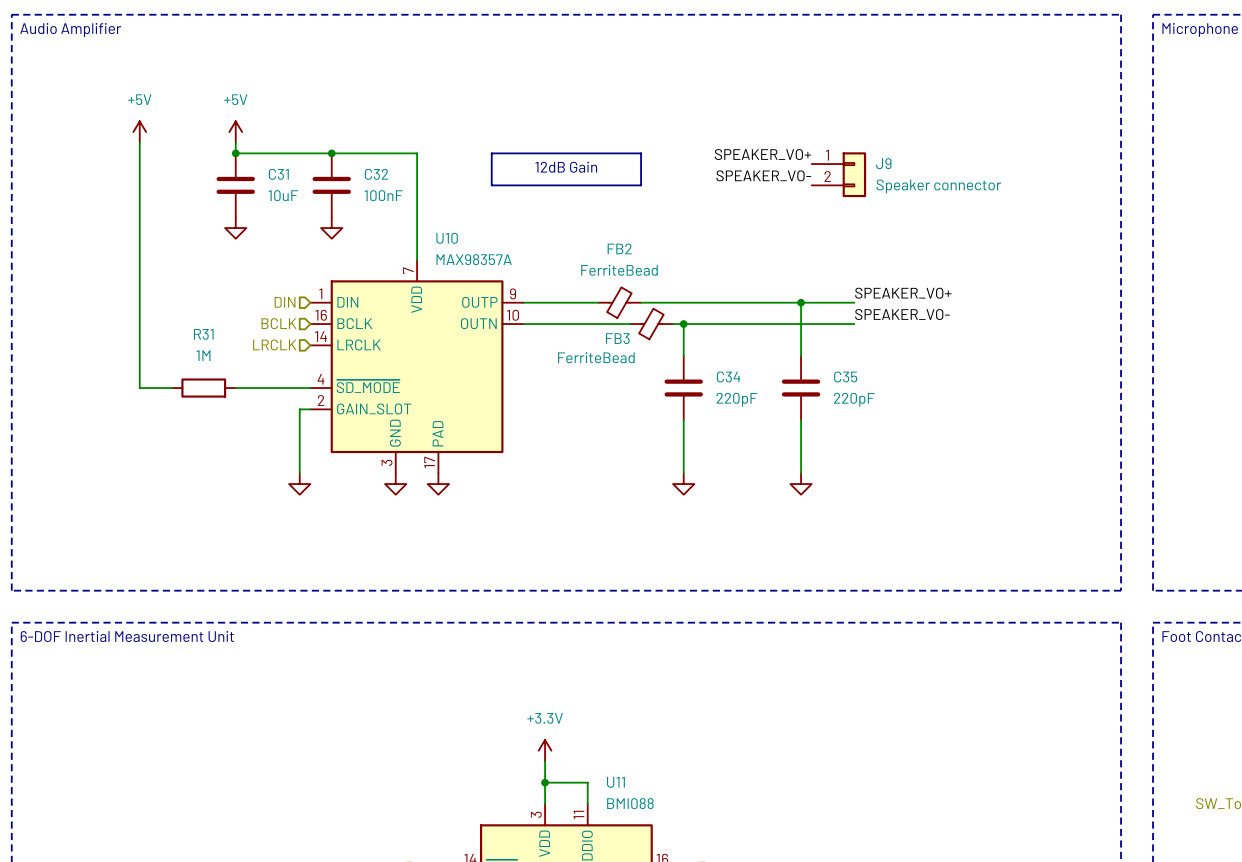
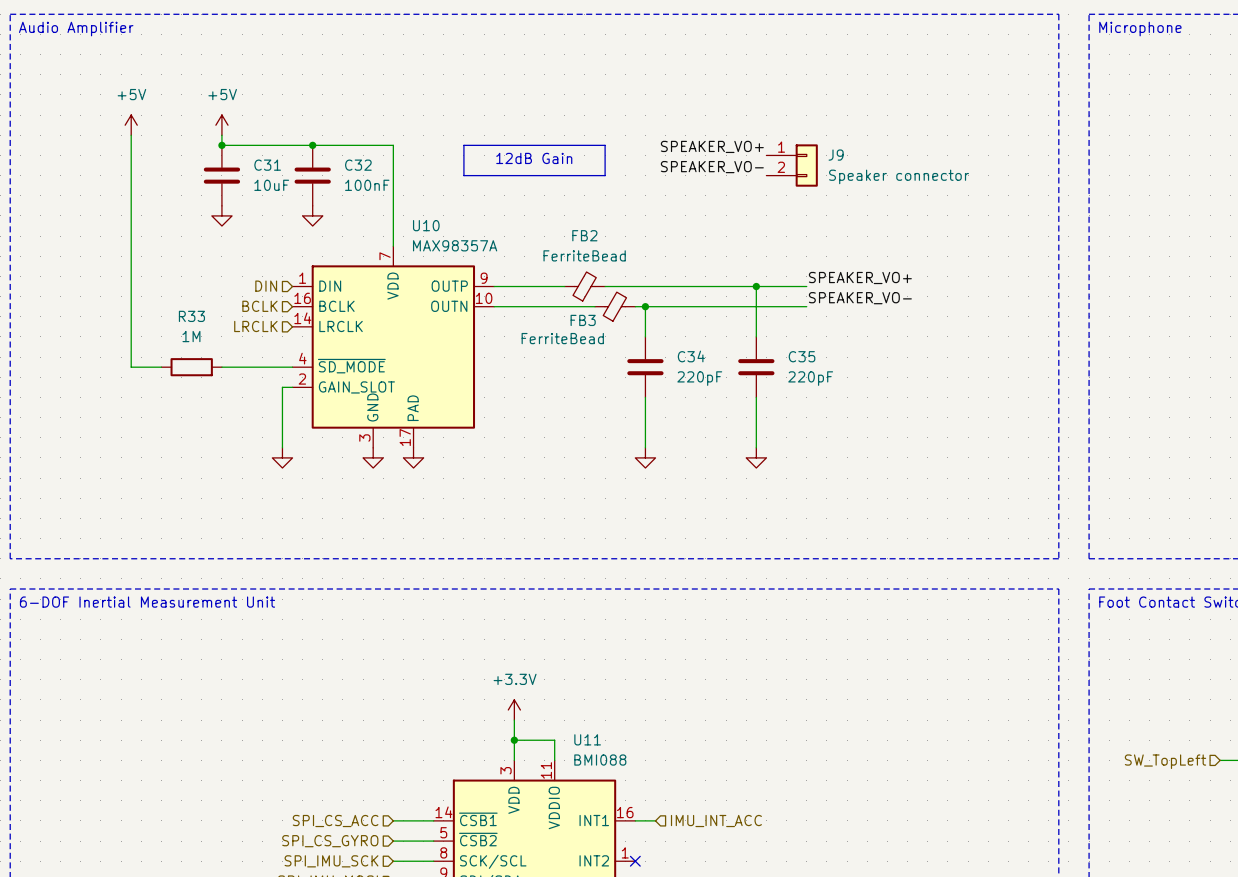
R31 name: R31 (203, 334) -> R33 (191, 316)

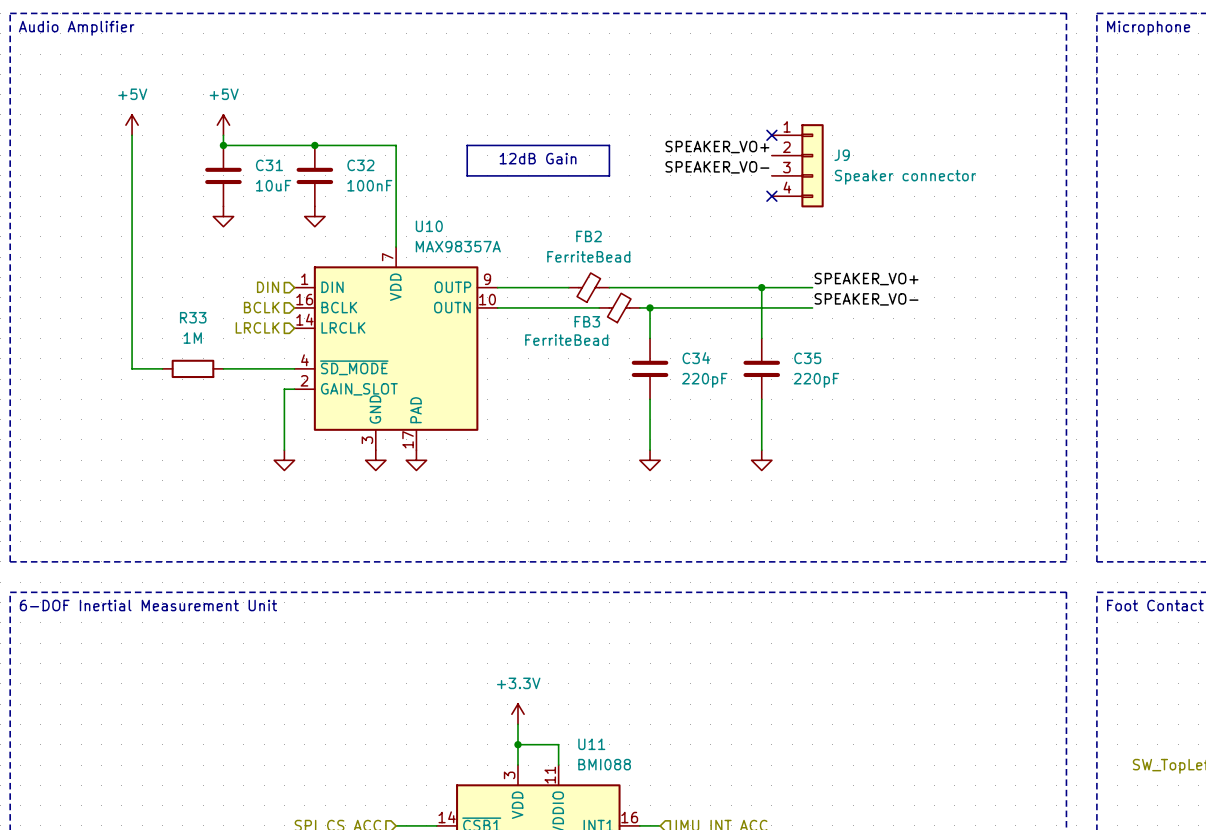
no-connect mark: none -> (771, 135)
J9 symbol: [766, 144, 818, 187] -> [771, 124, 824, 208]
no-connect mark: none -> (771, 196)

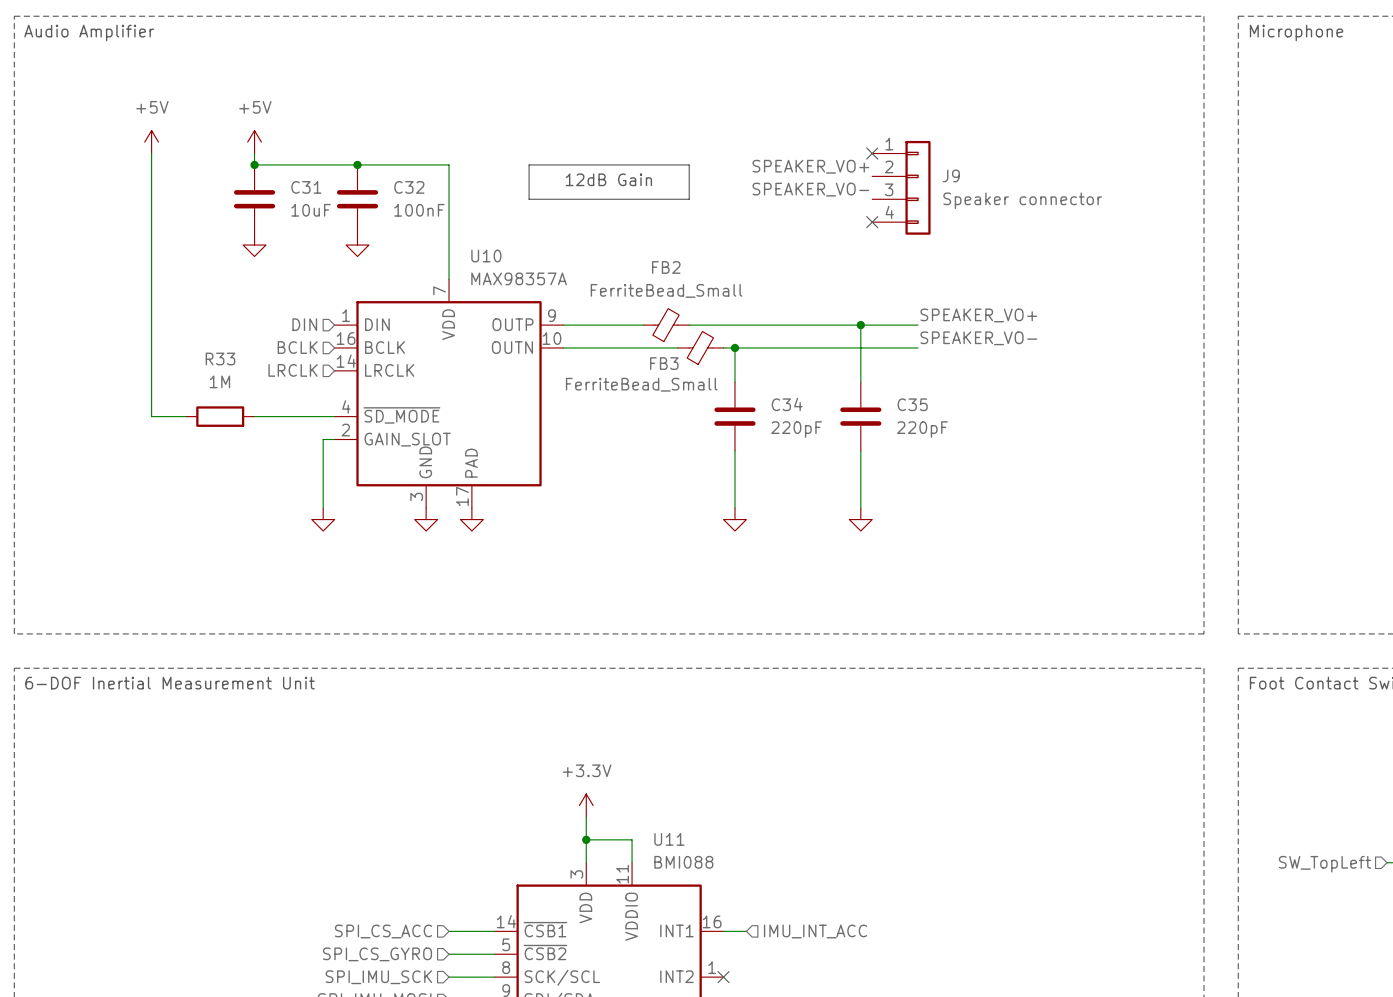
FB2 value: FerriteBead (588, 256) -> FerriteBead_Small (666, 290)
FB3 value: FerriteBead (566, 340) -> FerriteBead_Small (641, 384)

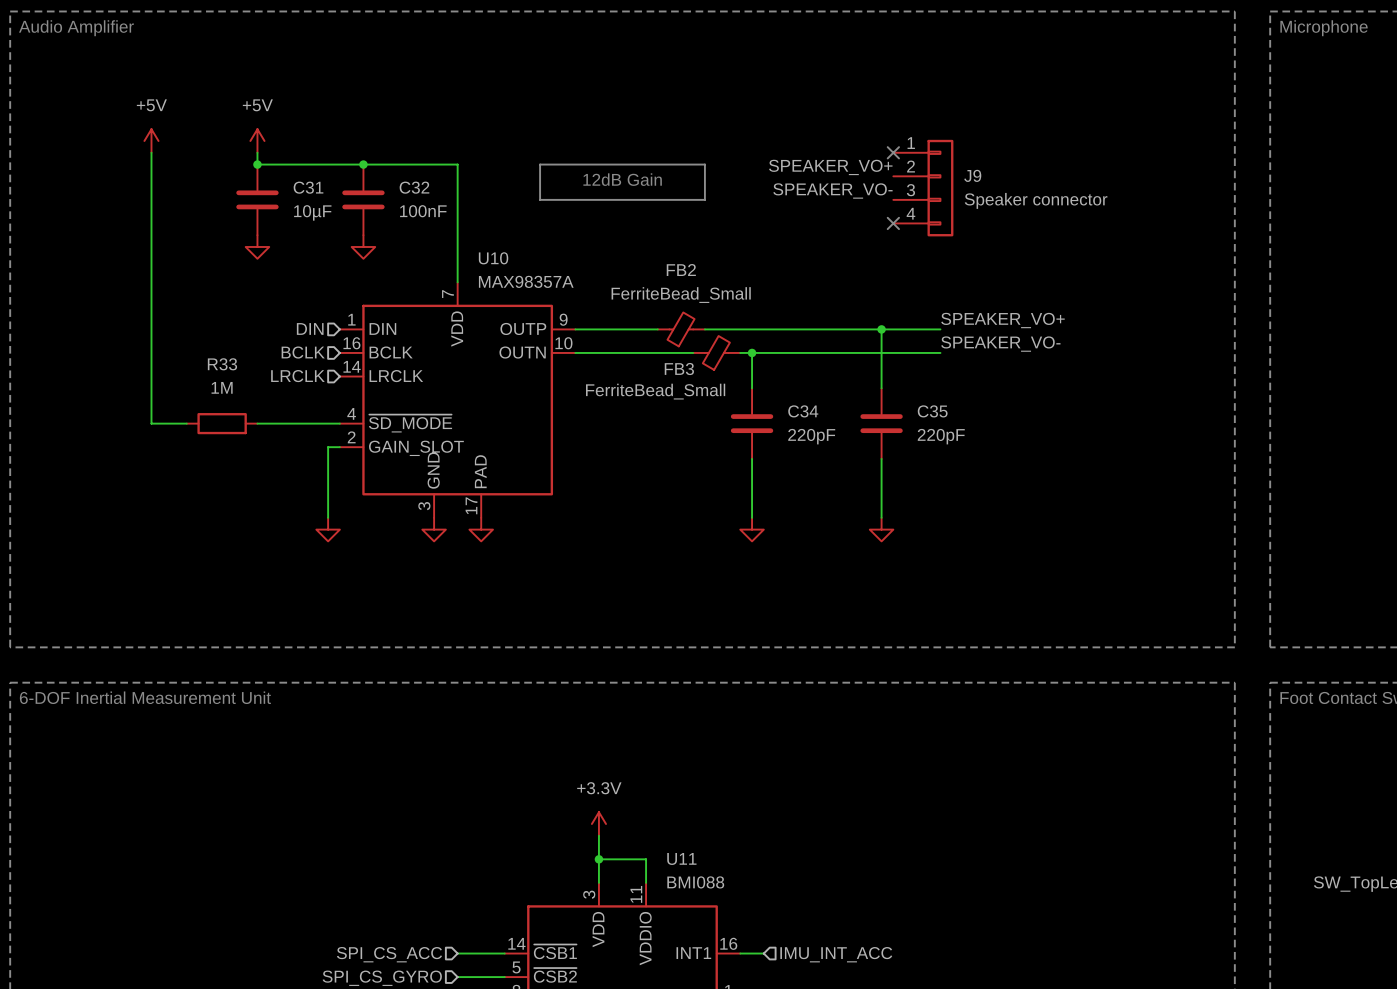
C31 value: 10uF (311, 210) -> 10µF (312, 212)

